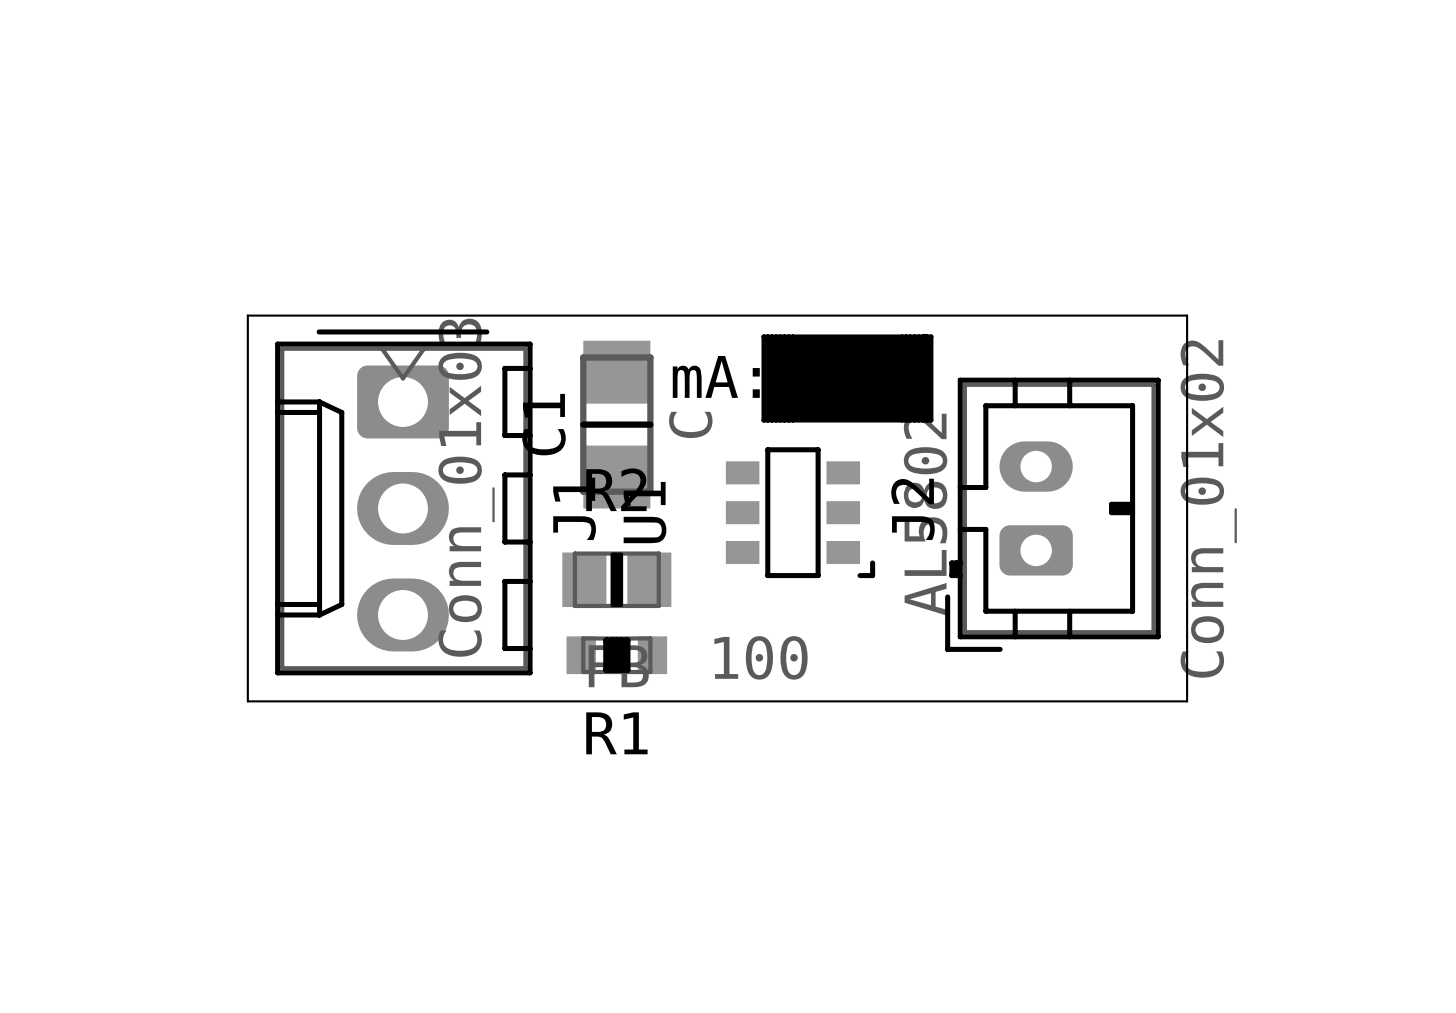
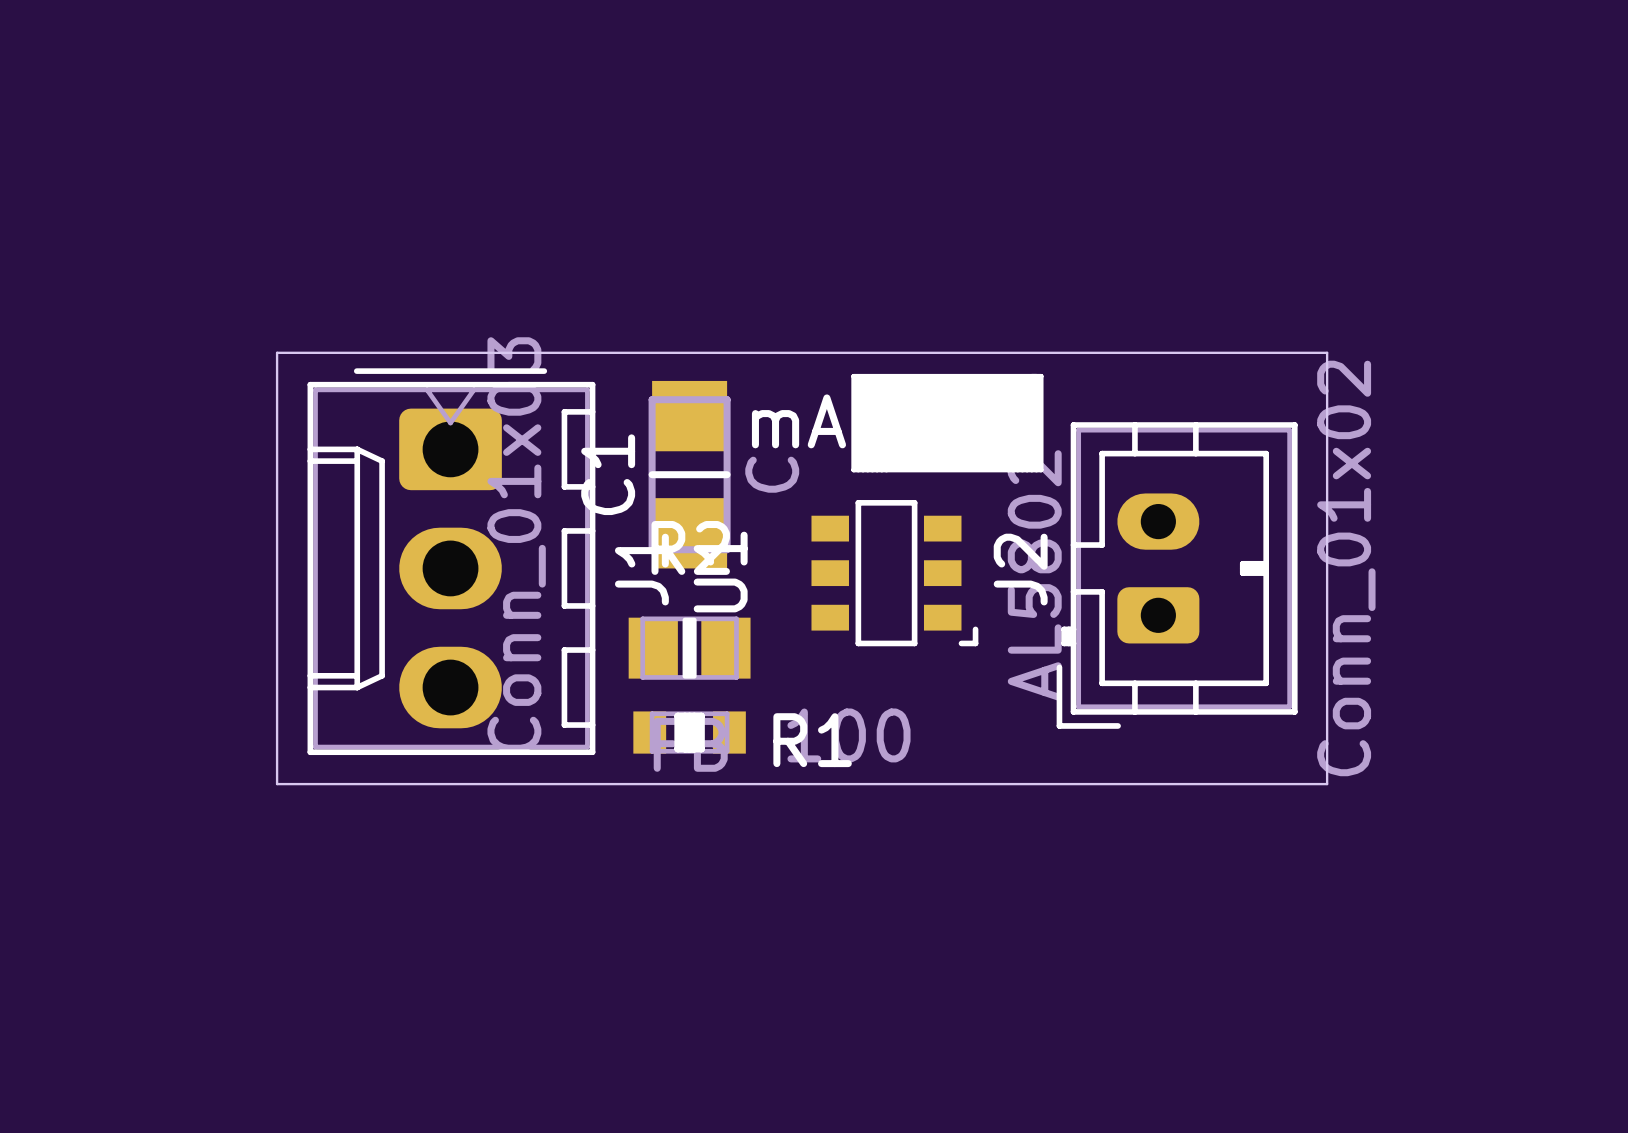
R1 name position: R1 (616, 733) -> R1 (812, 740)

